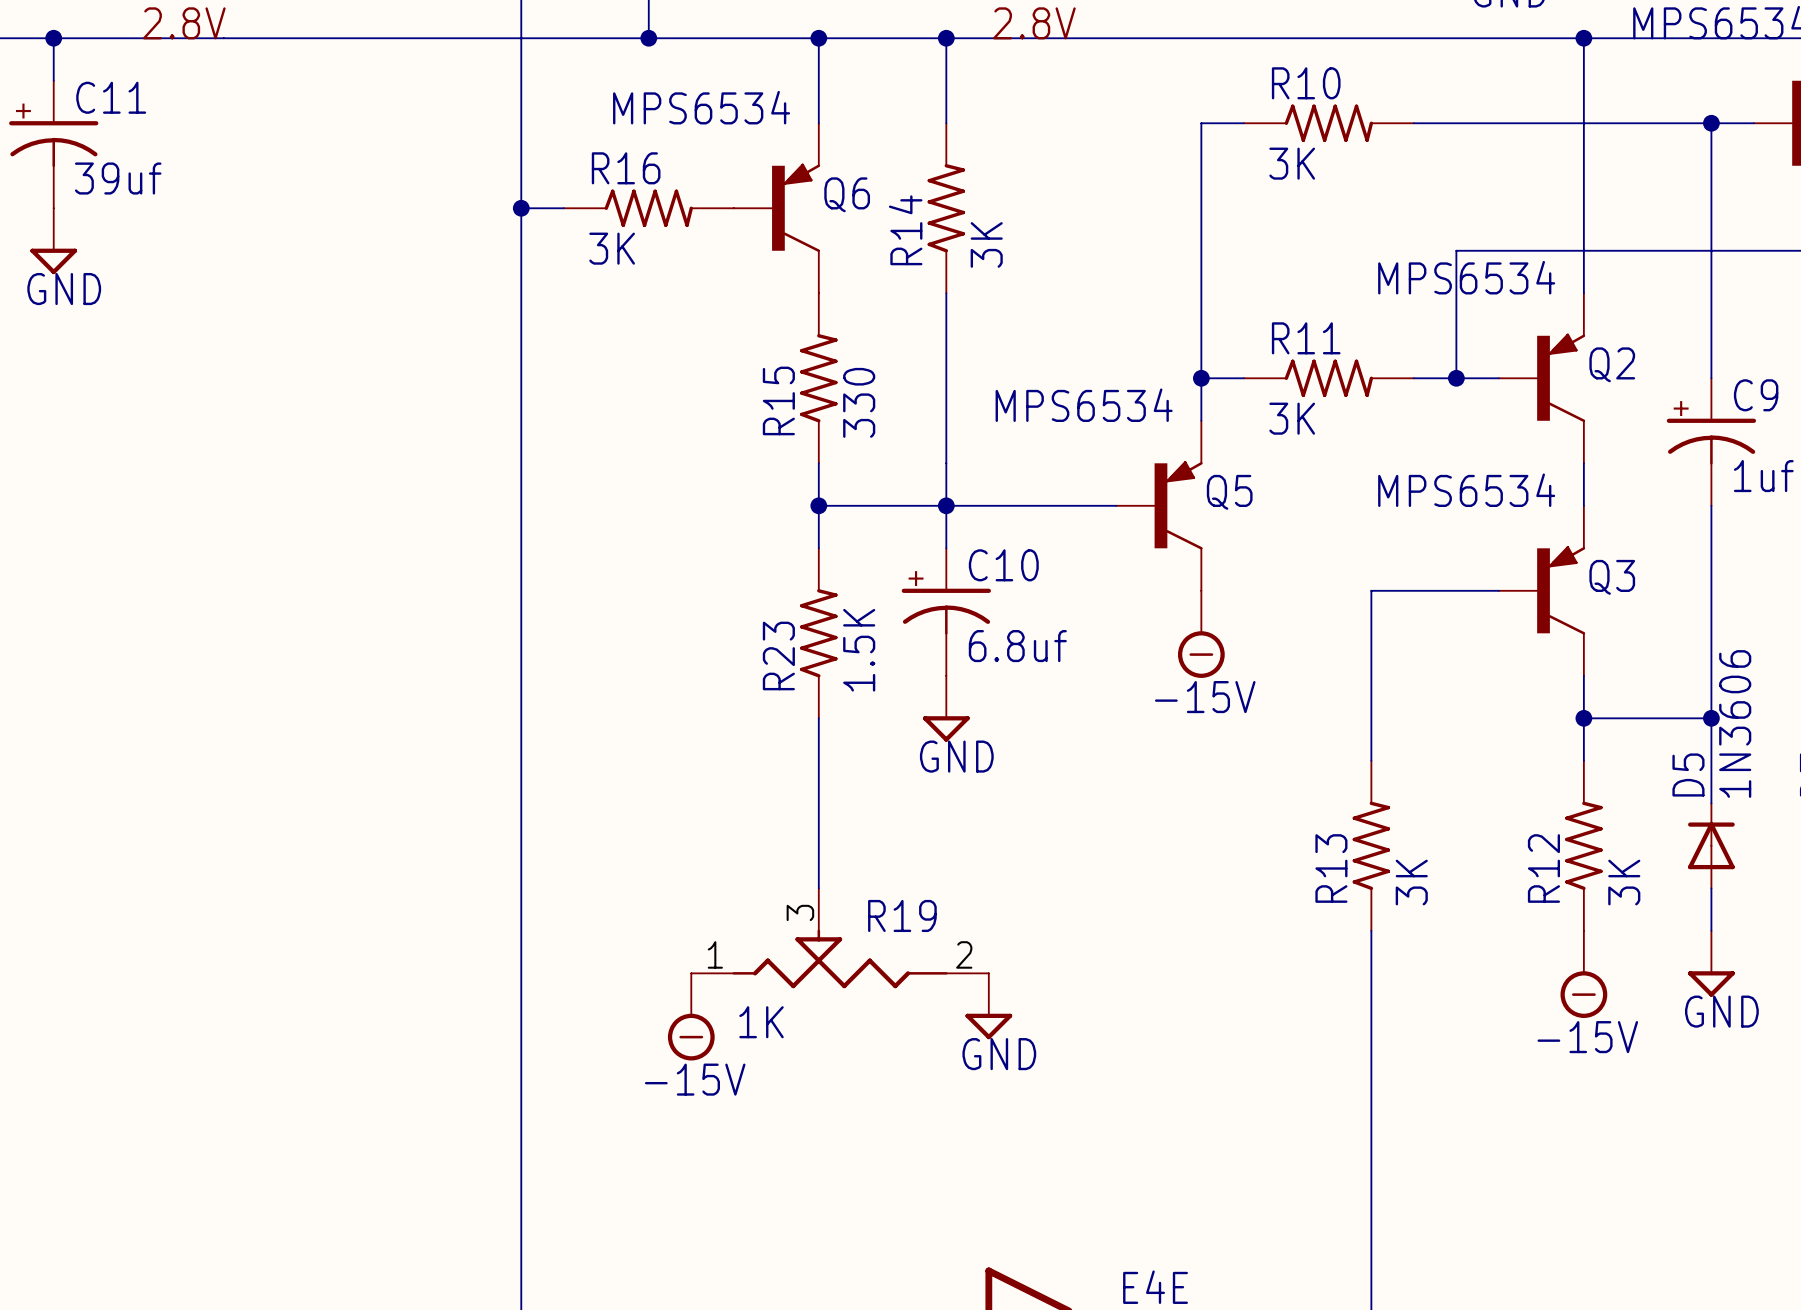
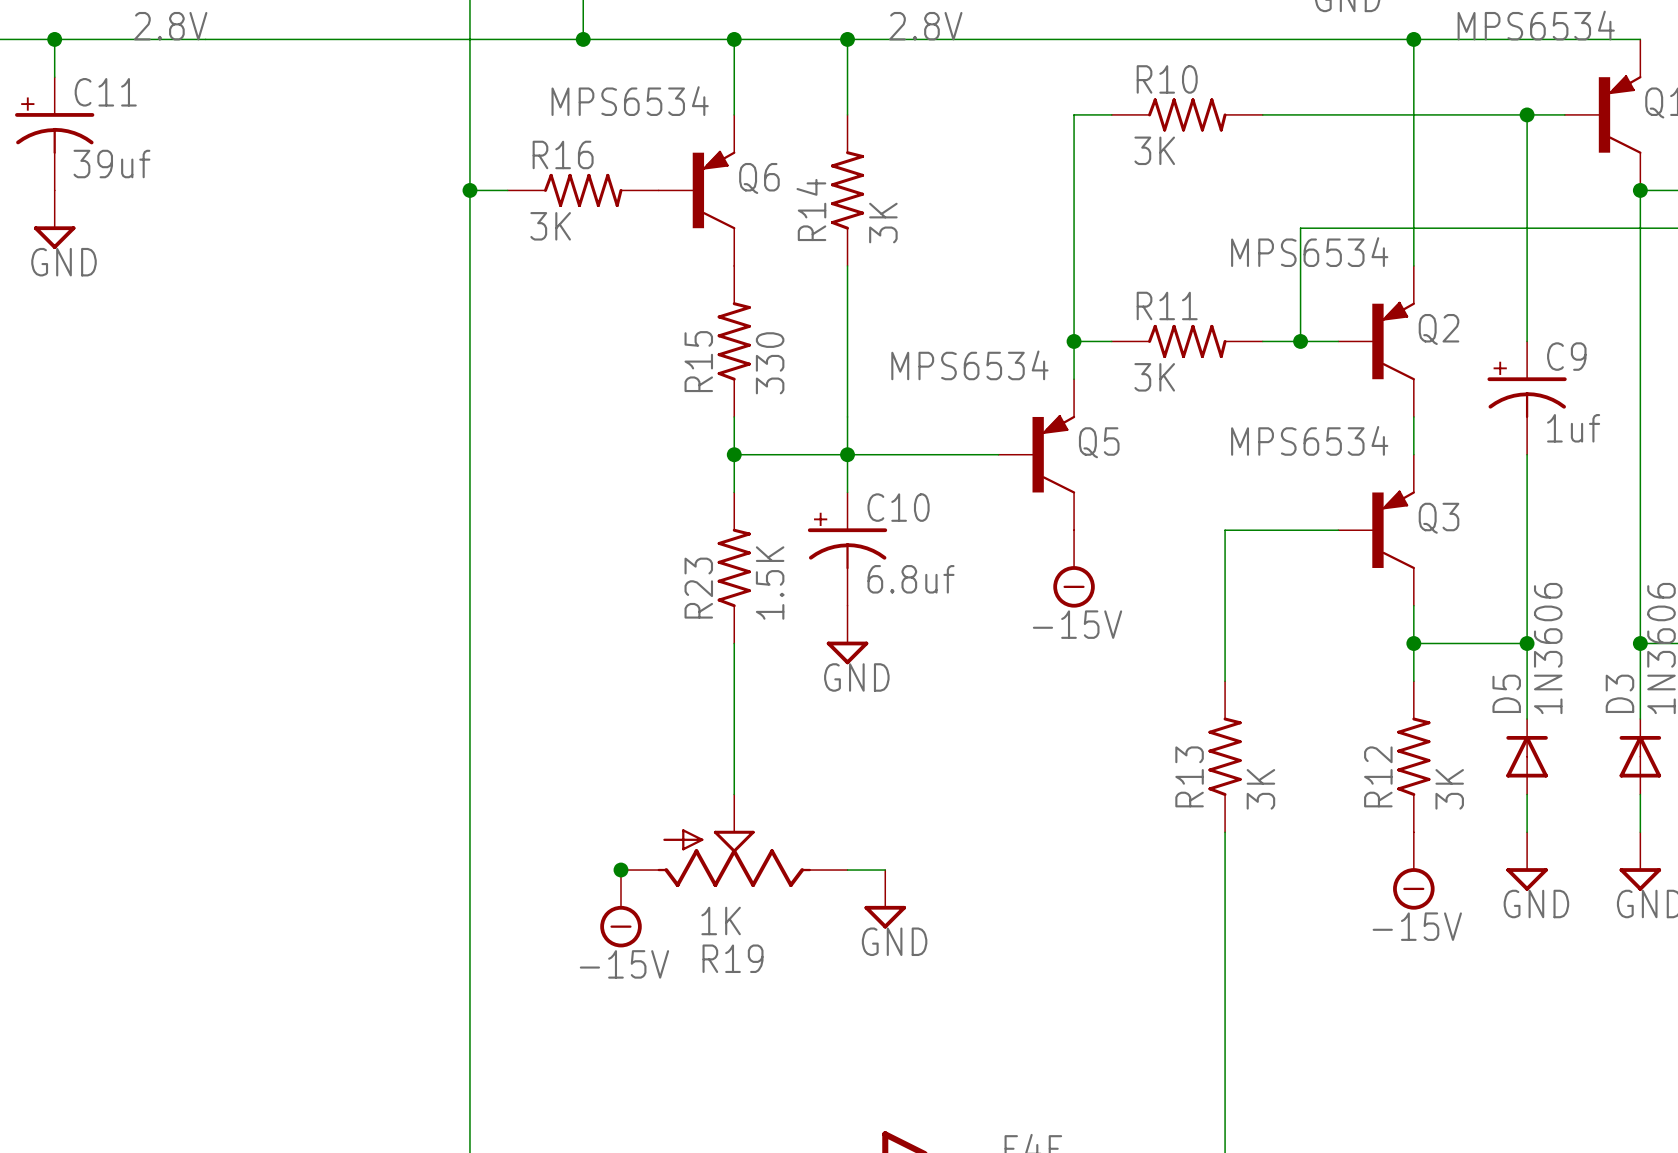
R19 symbol: [691, 888, 989, 989] -> [620, 794, 848, 888]
R19 name position: R19 (902, 915) -> R19 (733, 958)
junction: none -> (620, 870)
R19 value position: 1K (761, 1022) -> 1K (721, 920)

